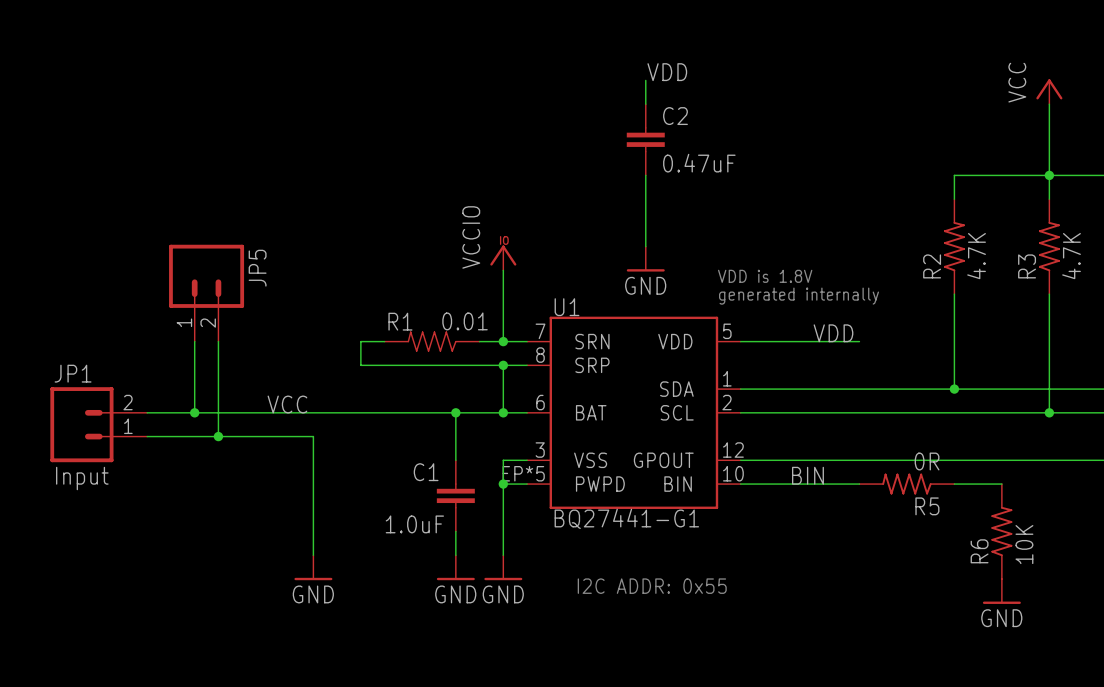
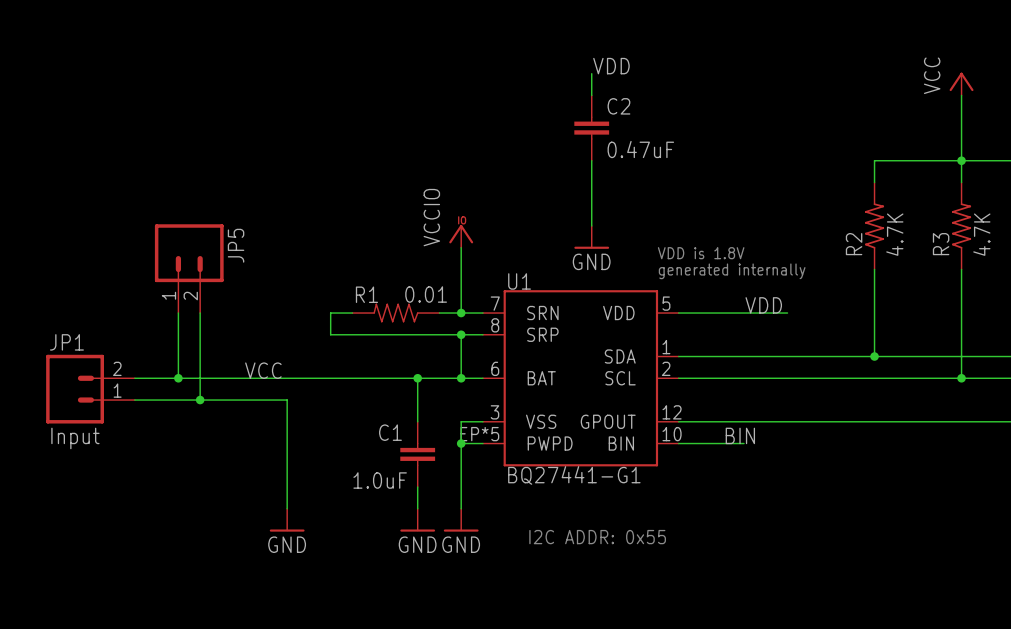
wire: (811, 484) (859, 484) -> none
R5: 0R (906, 484) -> none
wire: (954, 484) (1001, 484) -> none
R6: 10K (1001, 531) -> none
power symbol: GND (1001, 591) -> none

